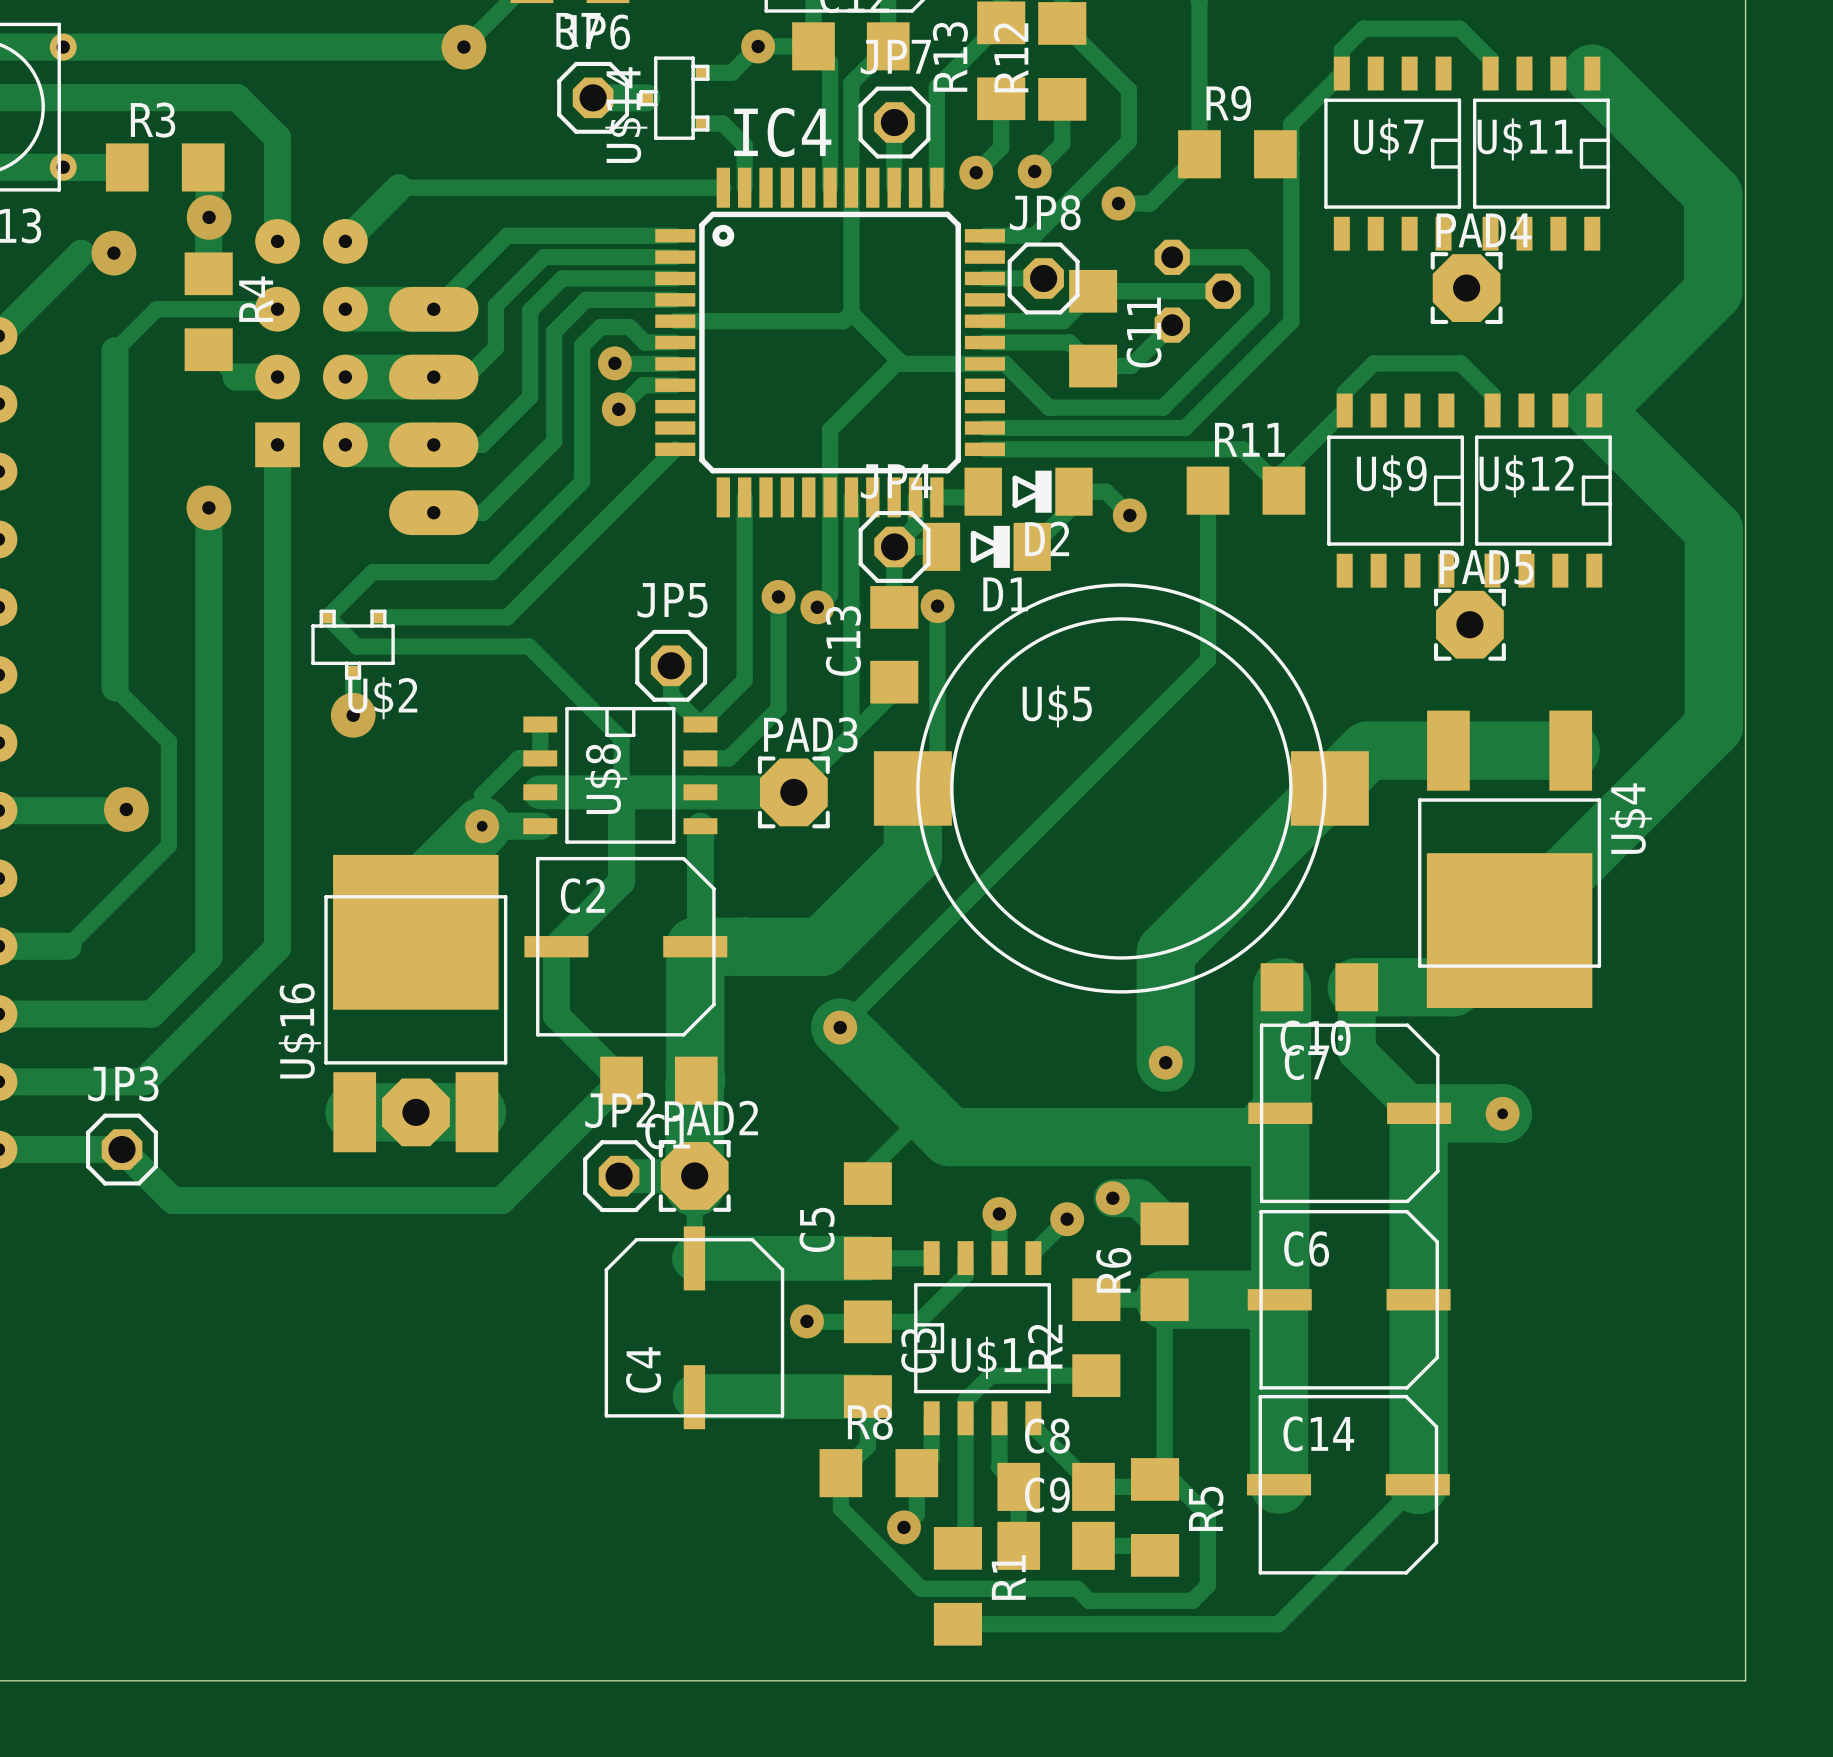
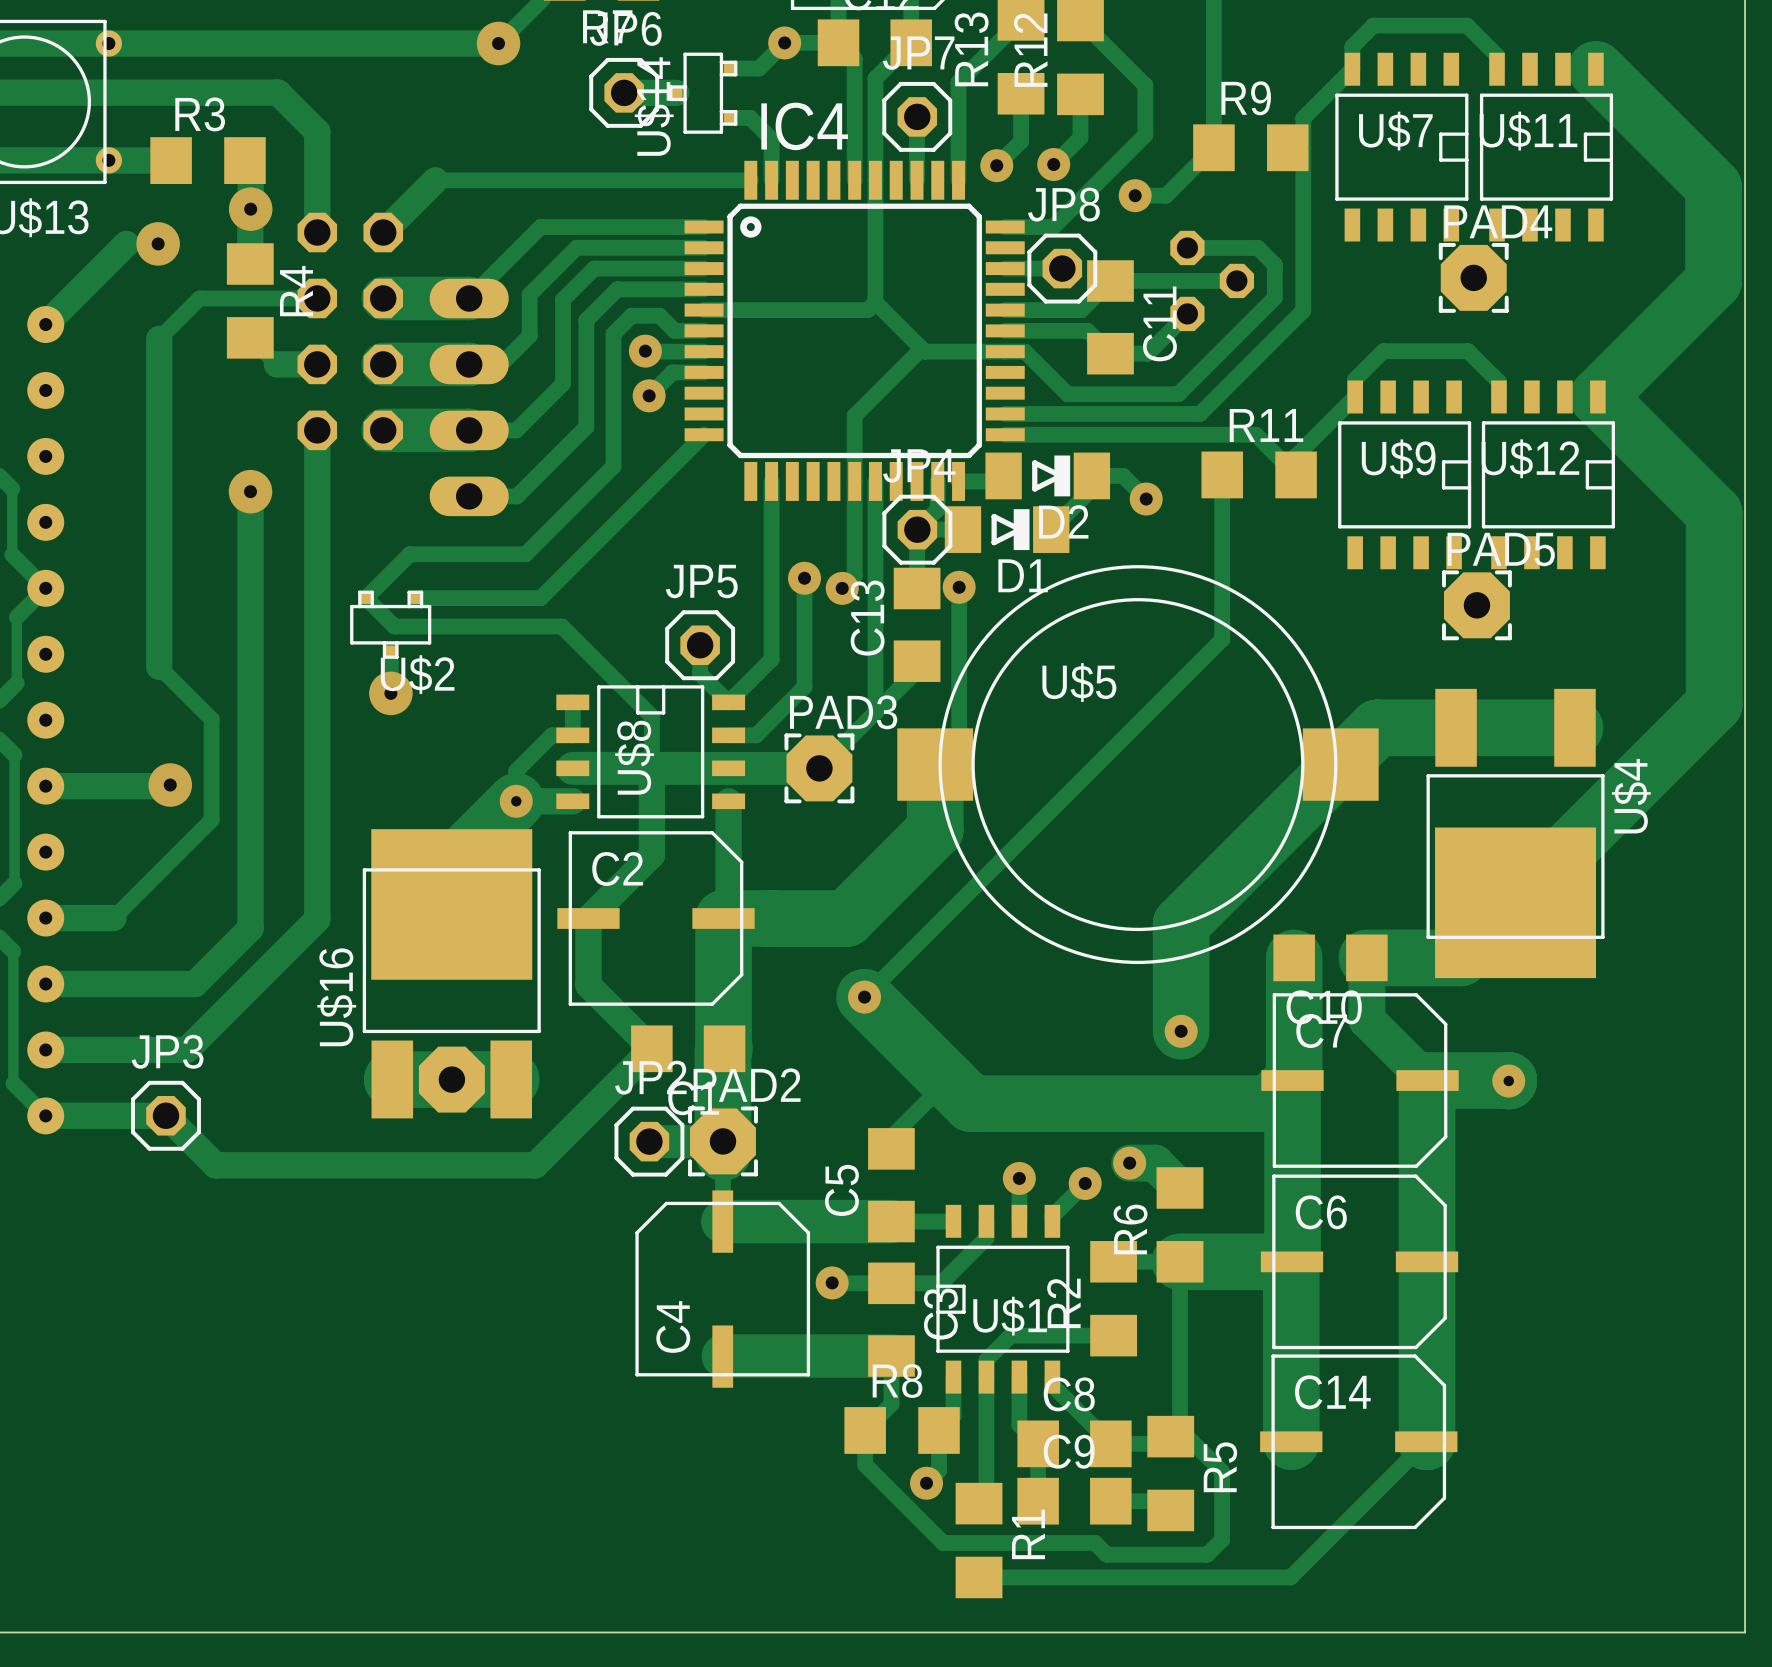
part footprint: [255, 219, 368, 468] -> [297, 212, 404, 451]
part footprint: [389, 286, 479, 536] -> [429, 278, 509, 517]

